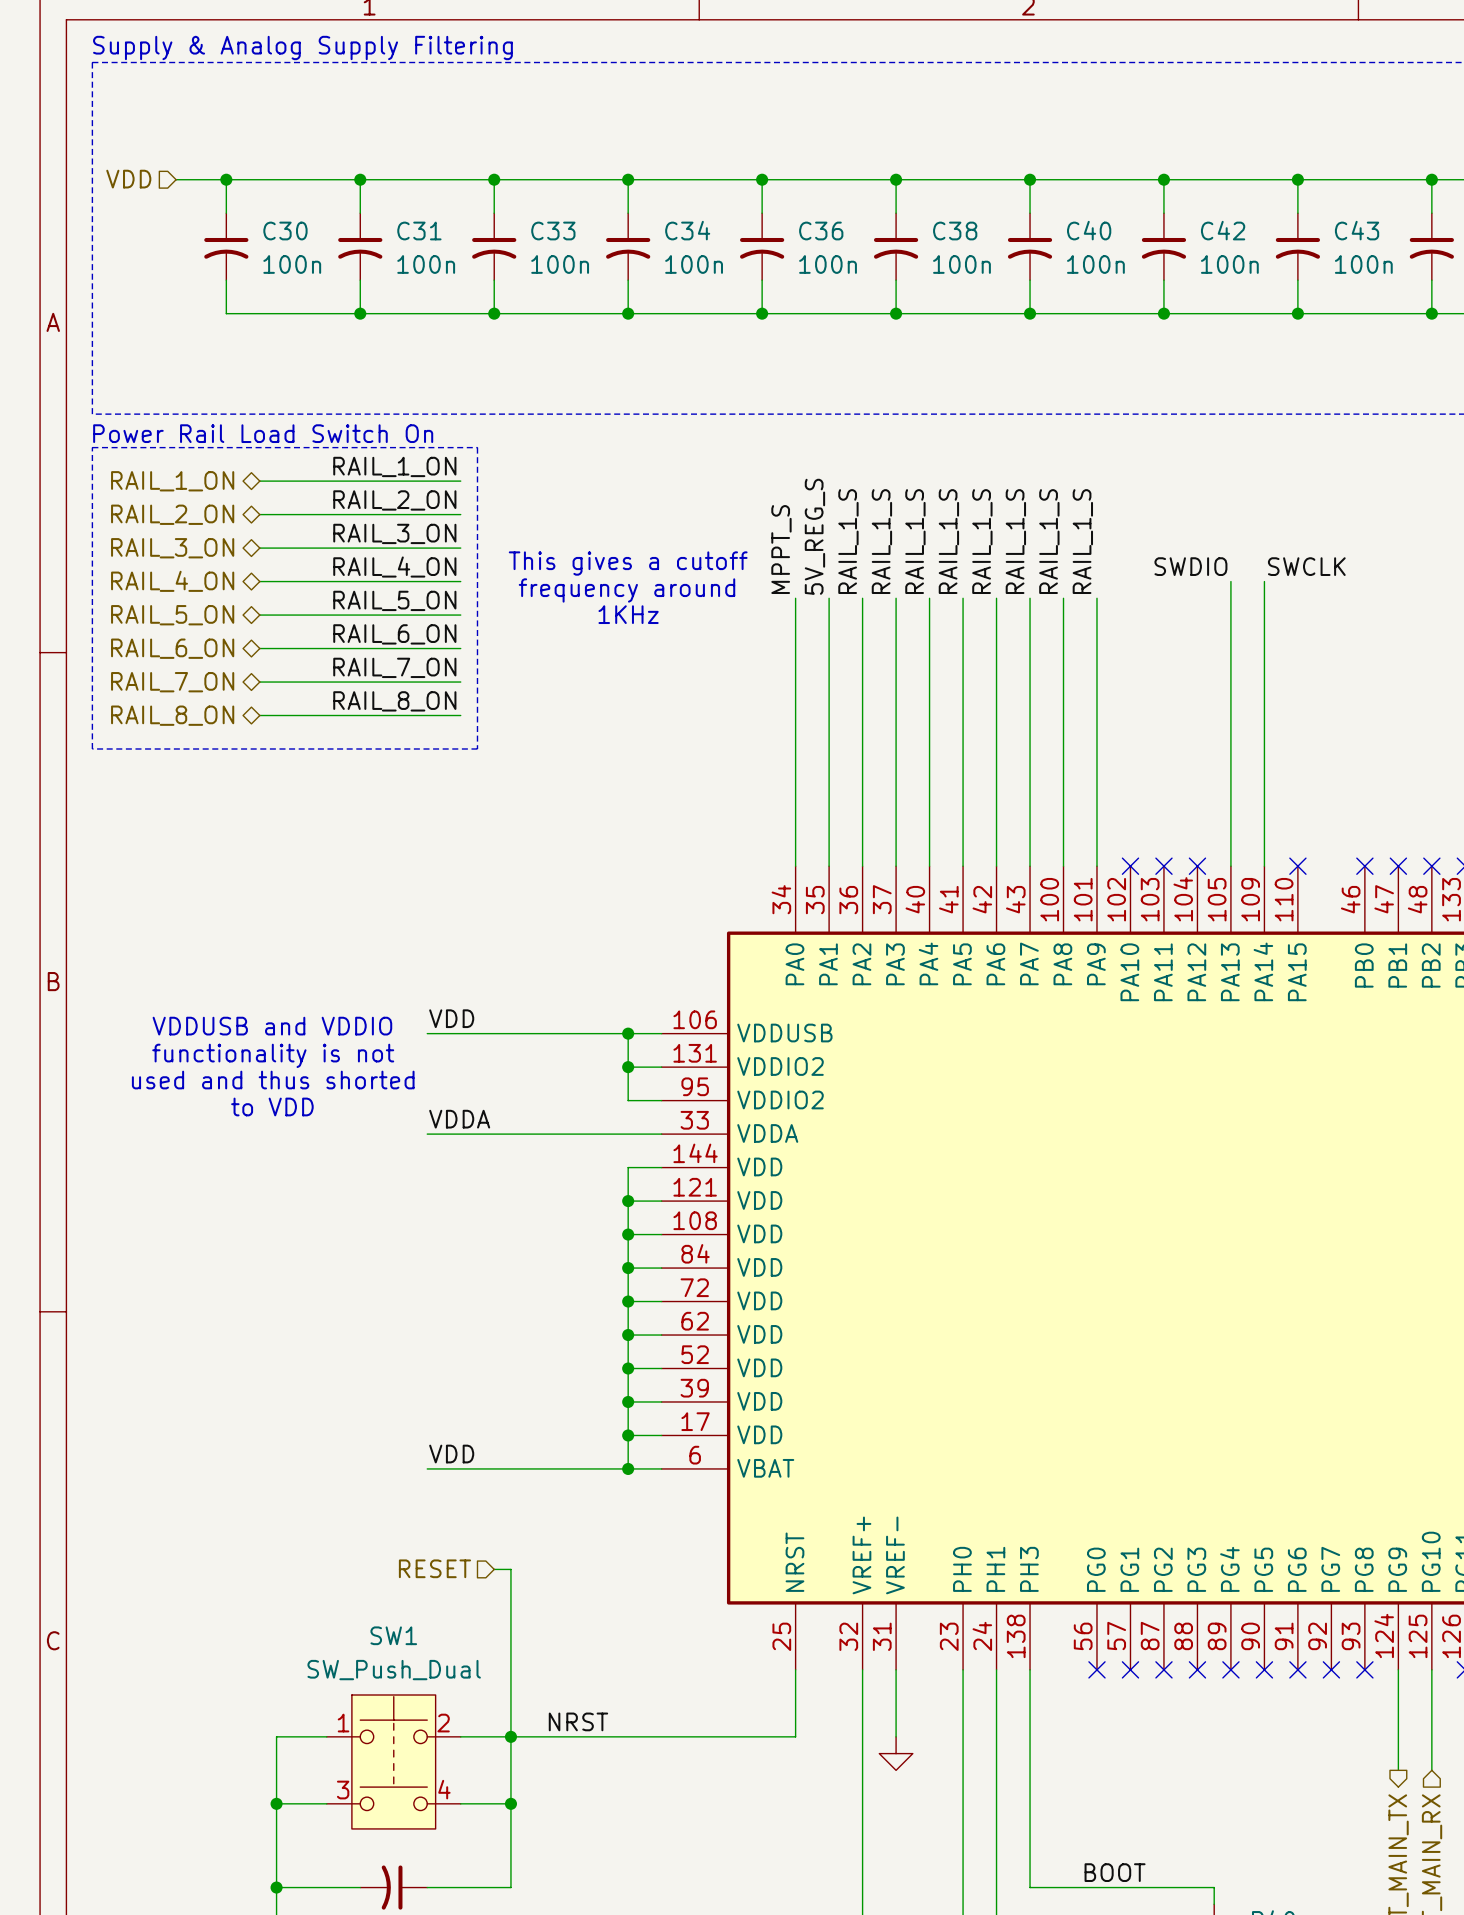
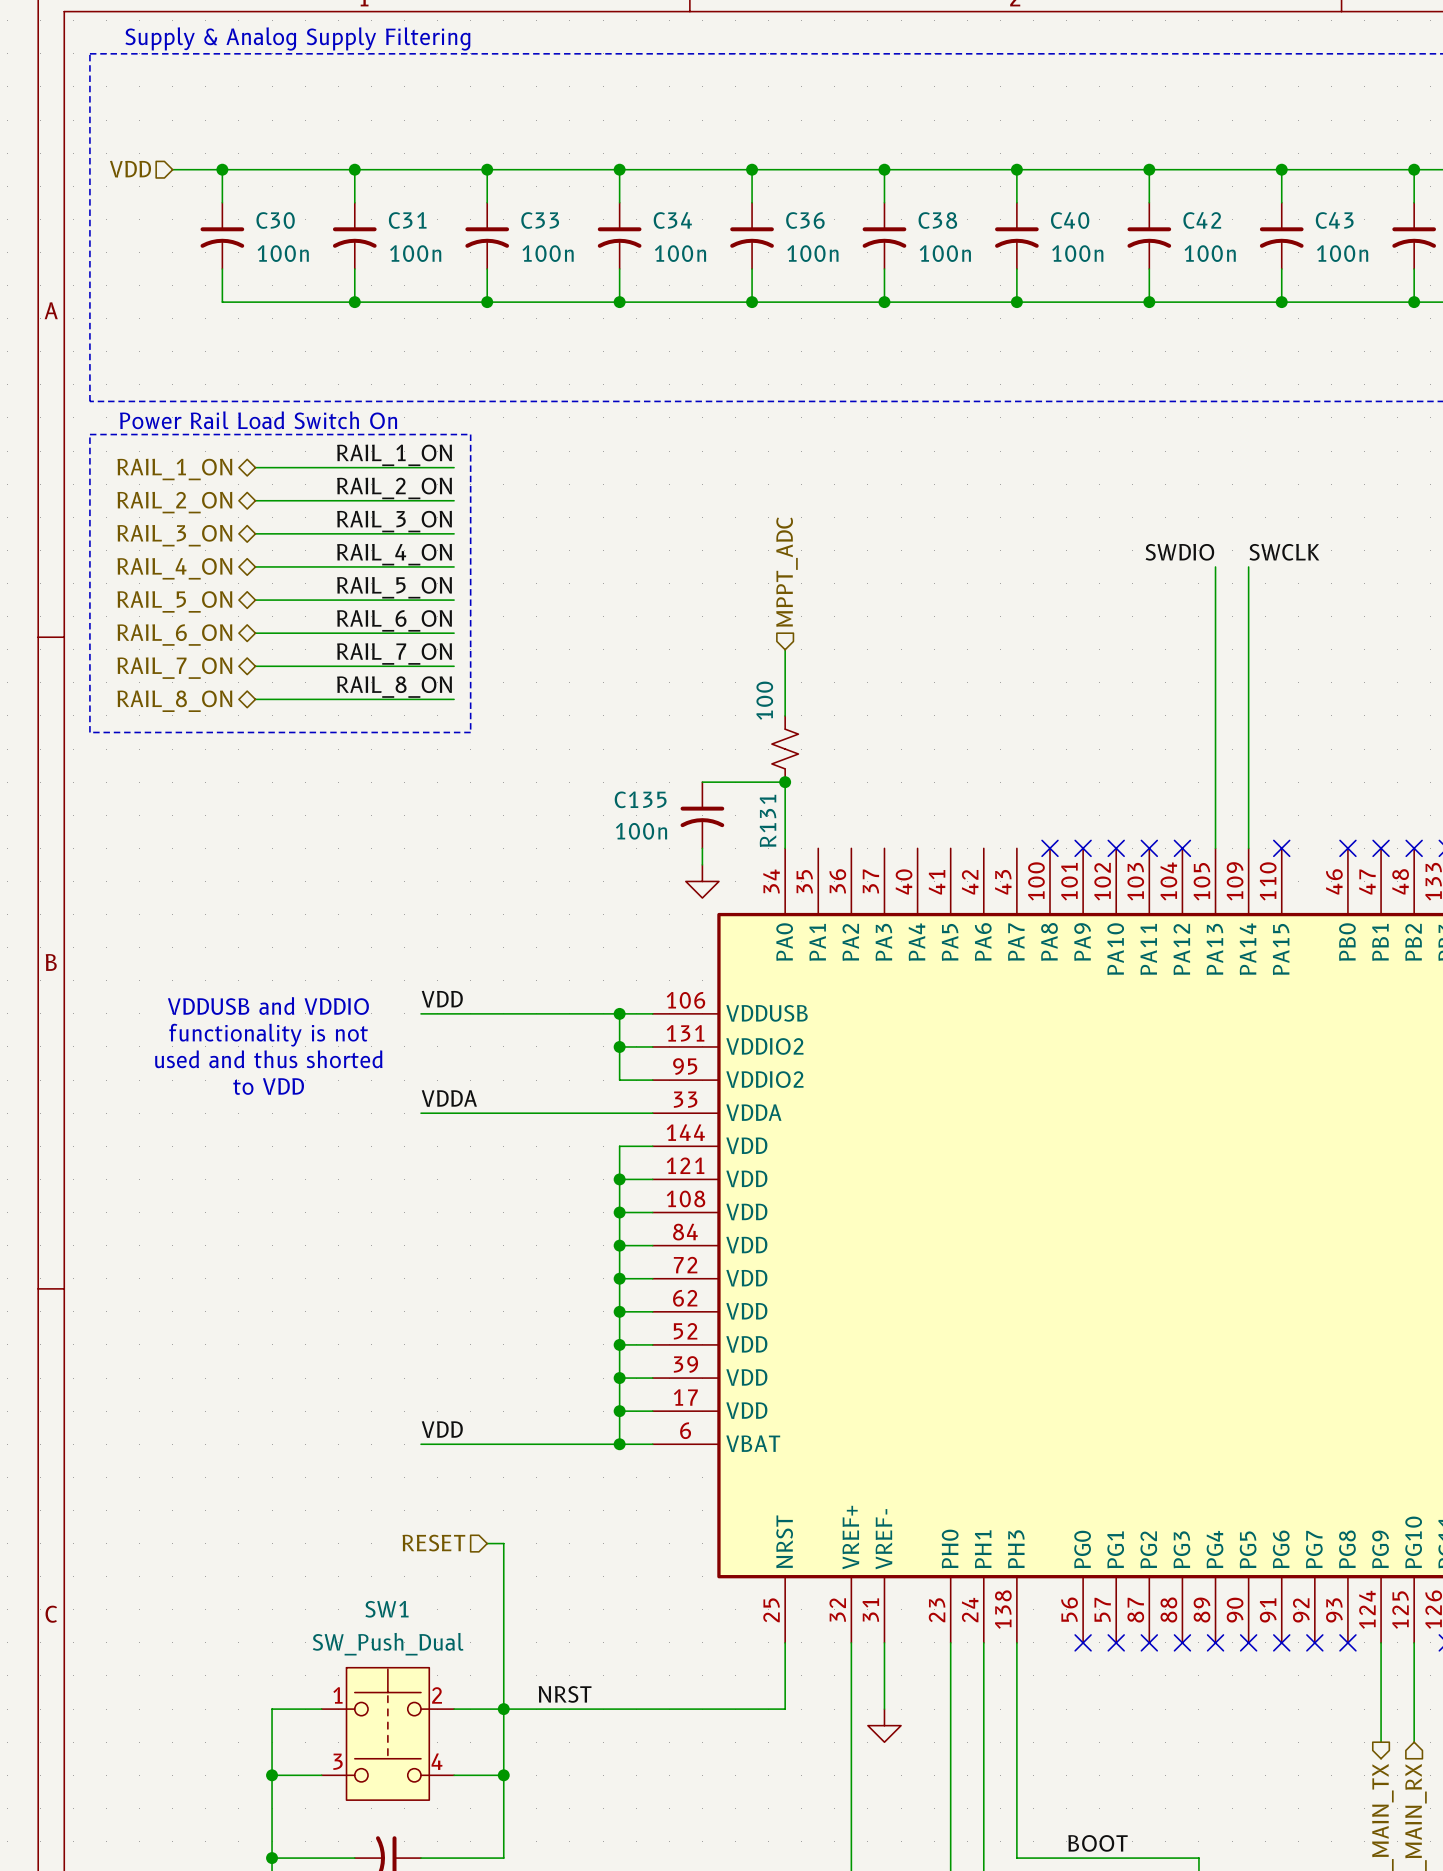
label: 5V_REG_S (814, 536) -> none
label: RAIL_1_S (848, 541) -> none
label: RAIL_1_S (881, 541) -> none
label: RAIL_1_S (915, 541) -> none
label: RAIL_1_S (948, 541) -> none
label: RAIL_1_S (982, 541) -> none
label: RAIL_1_S (1015, 541) -> none
label: RAIL_1_S (1049, 541) -> none
label: RAIL_1_S (1082, 541) -> none
label: MPPT_S (781, 549) -> none
text: This gives a cutoff (628, 563) -> none
hierarchical label: none -> MPPT_ADC (787, 572)
text: frequency around (626, 590) -> none
wire: (795, 598) (795, 665) -> none
wire: (829, 598) (829, 866) -> none
wire: (862, 598) (862, 866) -> none
wire: (896, 598) (896, 866) -> none
wire: (929, 598) (929, 866) -> none
wire: (963, 598) (963, 866) -> none
wire: (996, 598) (996, 866) -> none
wire: (1030, 598) (1030, 866) -> none
wire: (1063, 598) (1063, 866) -> none
wire: (1096, 598) (1096, 866) -> none
text: 1KHz (628, 614) -> none
wire: (795, 732) (795, 799) -> (702, 782) (785, 782)
R131: none -> 100 (785, 749)
junction: none -> (785, 782)
C135: none -> 100n (702, 815)
wire: none -> (702, 848) (702, 864)
no-connect mark: none -> (1050, 848)
no-connect mark: none -> (1083, 848)
power symbol: none -> (702, 881)

